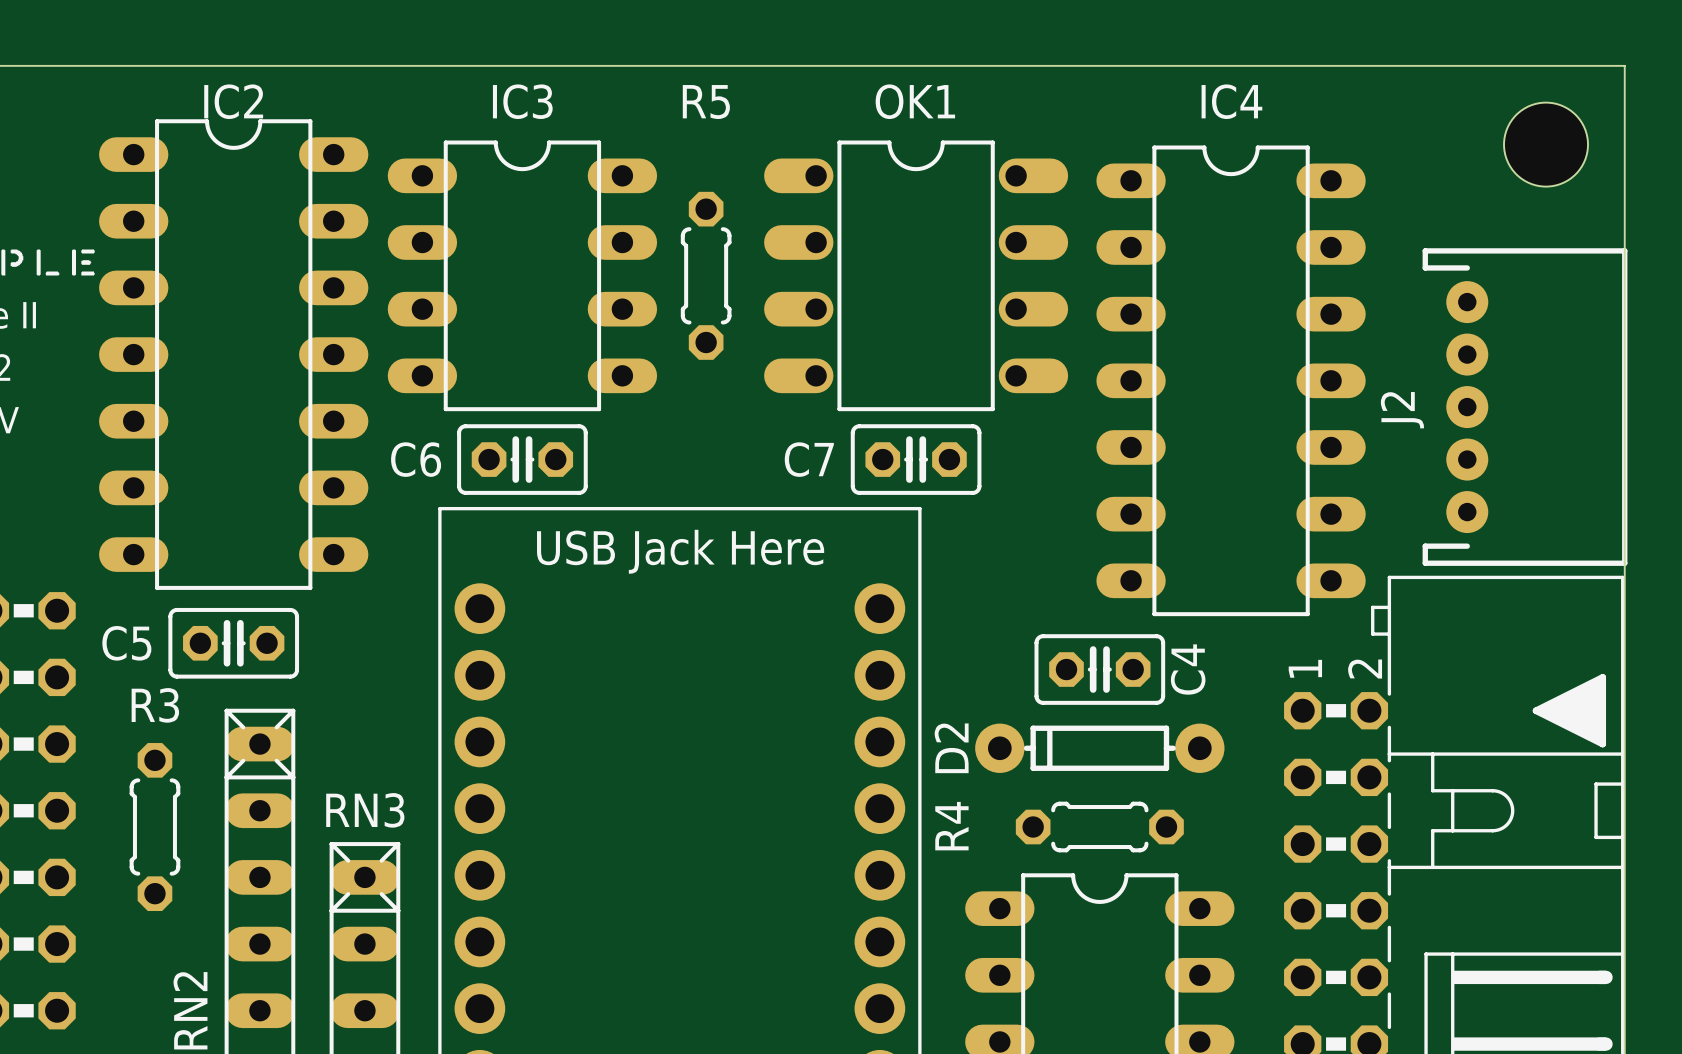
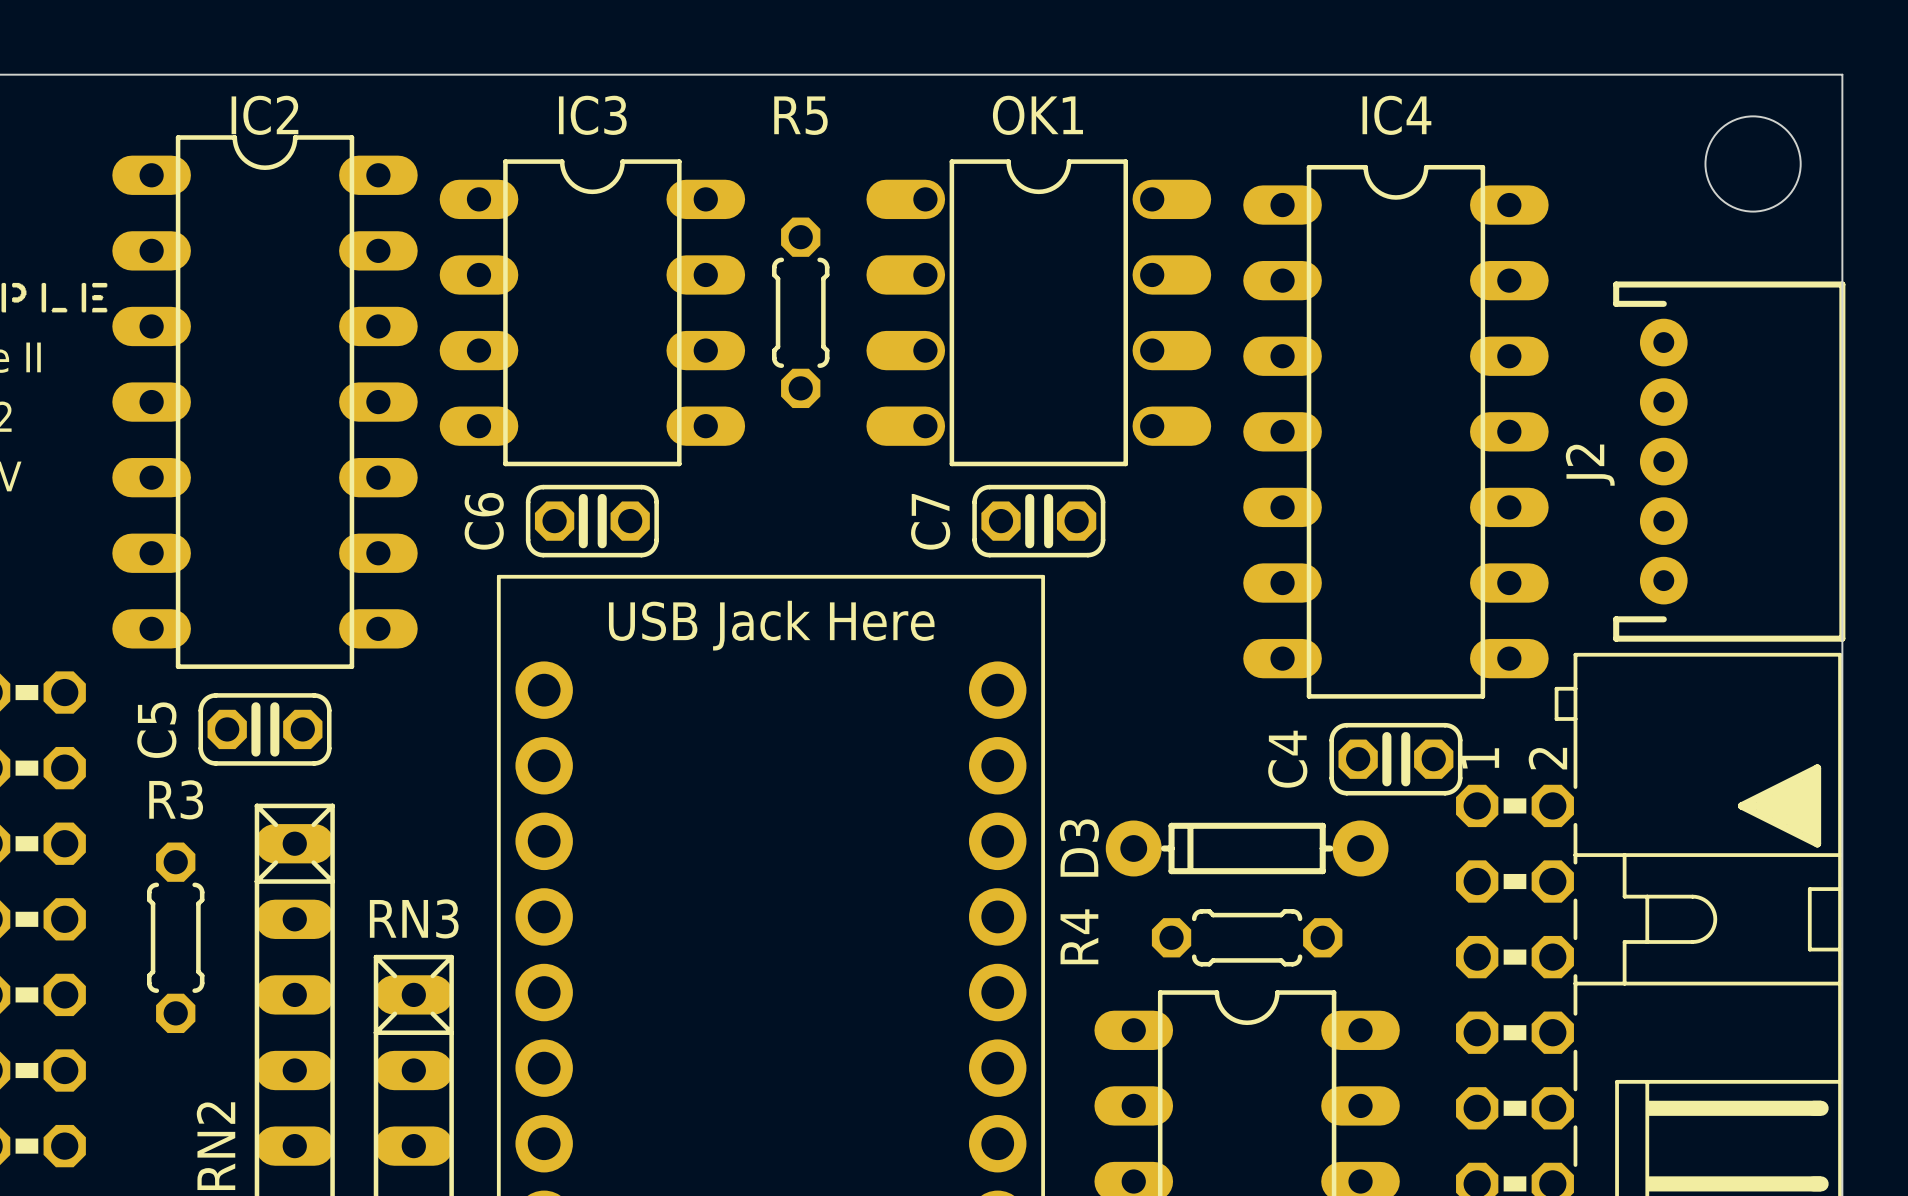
C6 footprint: [457, 424, 588, 495] -> [525, 484, 659, 558]
C7 footprint: [850, 424, 982, 495] -> [972, 484, 1106, 558]
C6 name rotation: 0° (416, 459) -> 90° counterclockwise (484, 521)
C7 name rotation: 0° (809, 459) -> 90° counterclockwise (930, 521)
C5 footprint: [168, 607, 300, 679] -> [198, 693, 332, 766]
C4 footprint: [1034, 634, 1166, 705] -> [1329, 722, 1463, 796]
C5 name rotation: 0° (126, 643) -> 90° counterclockwise (156, 730)
C4 name position: C4 (1188, 669) -> C4 (1287, 759)
D2 name: D2 (951, 748) -> D3 (1079, 848)

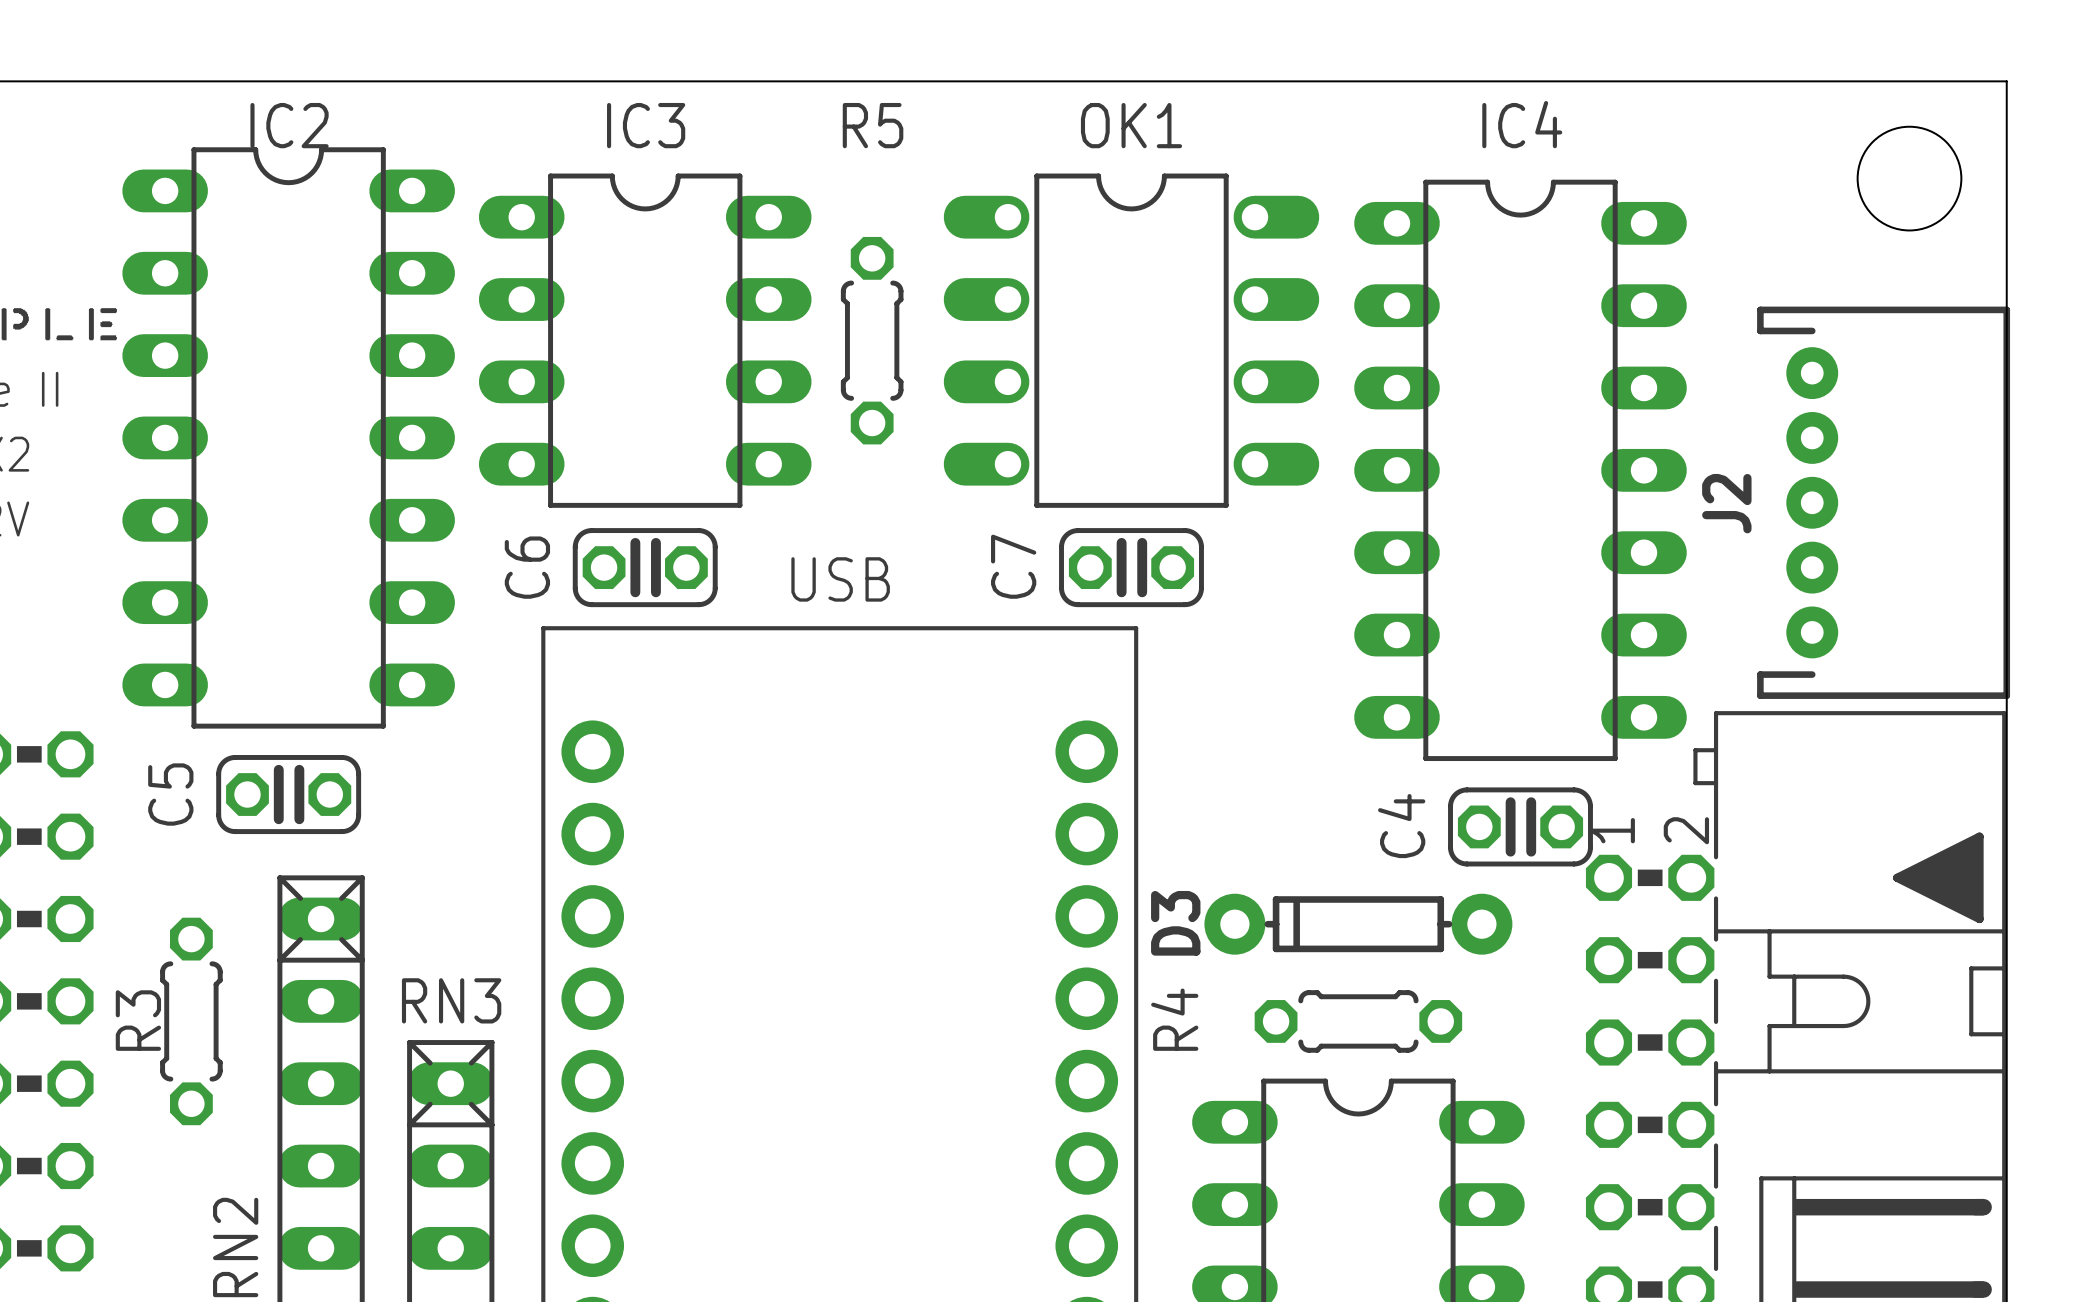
text: none -> USB (840, 579)
text: USB Jack Here (771, 625) -> none
R3 name rotation: 0° (176, 799) -> 90° counterclockwise (138, 1020)
R3 name position: R3 (176, 799) -> R3 (138, 1020)

